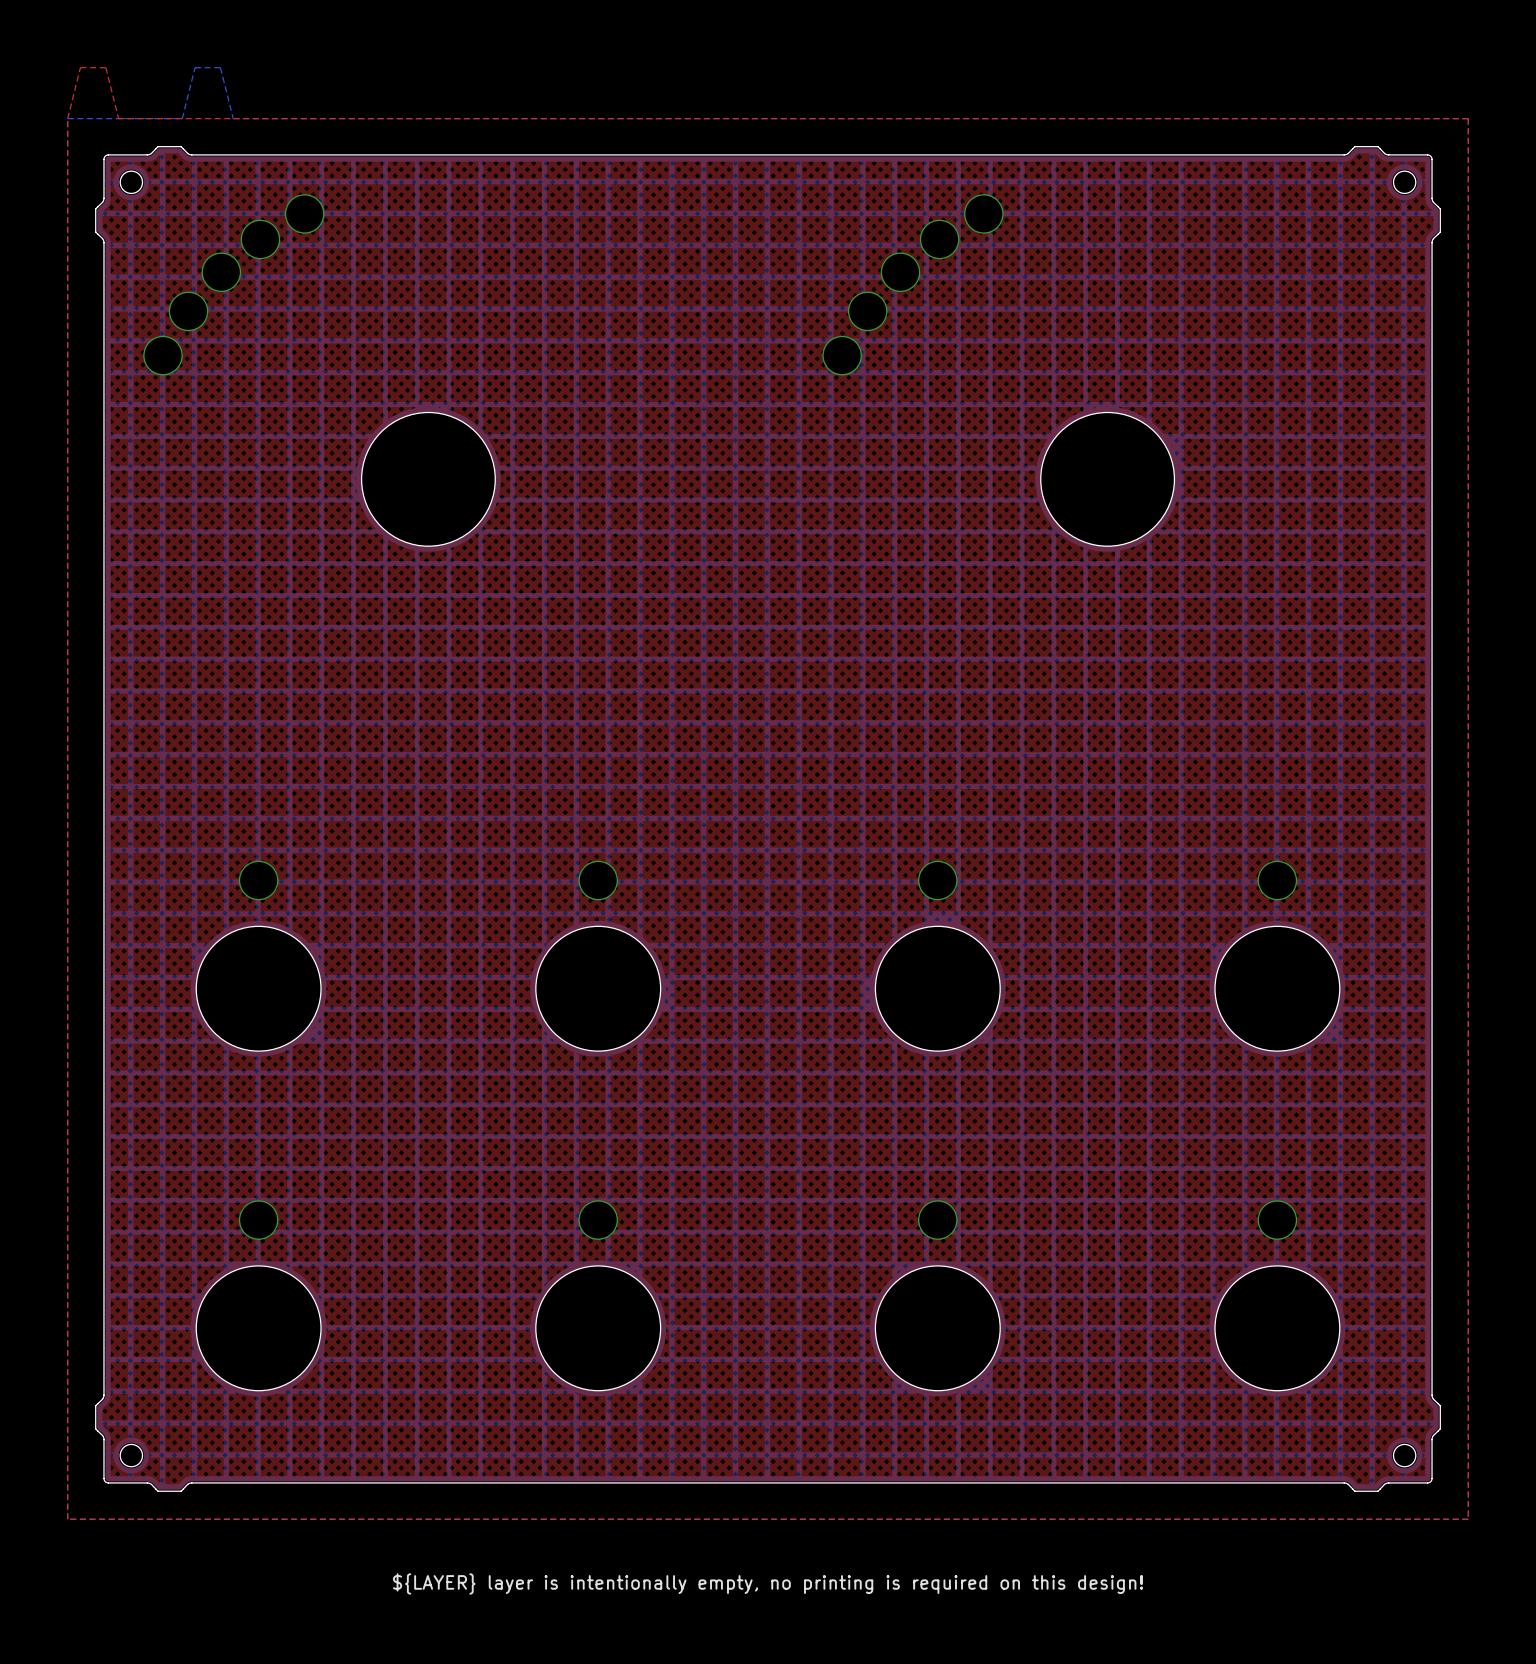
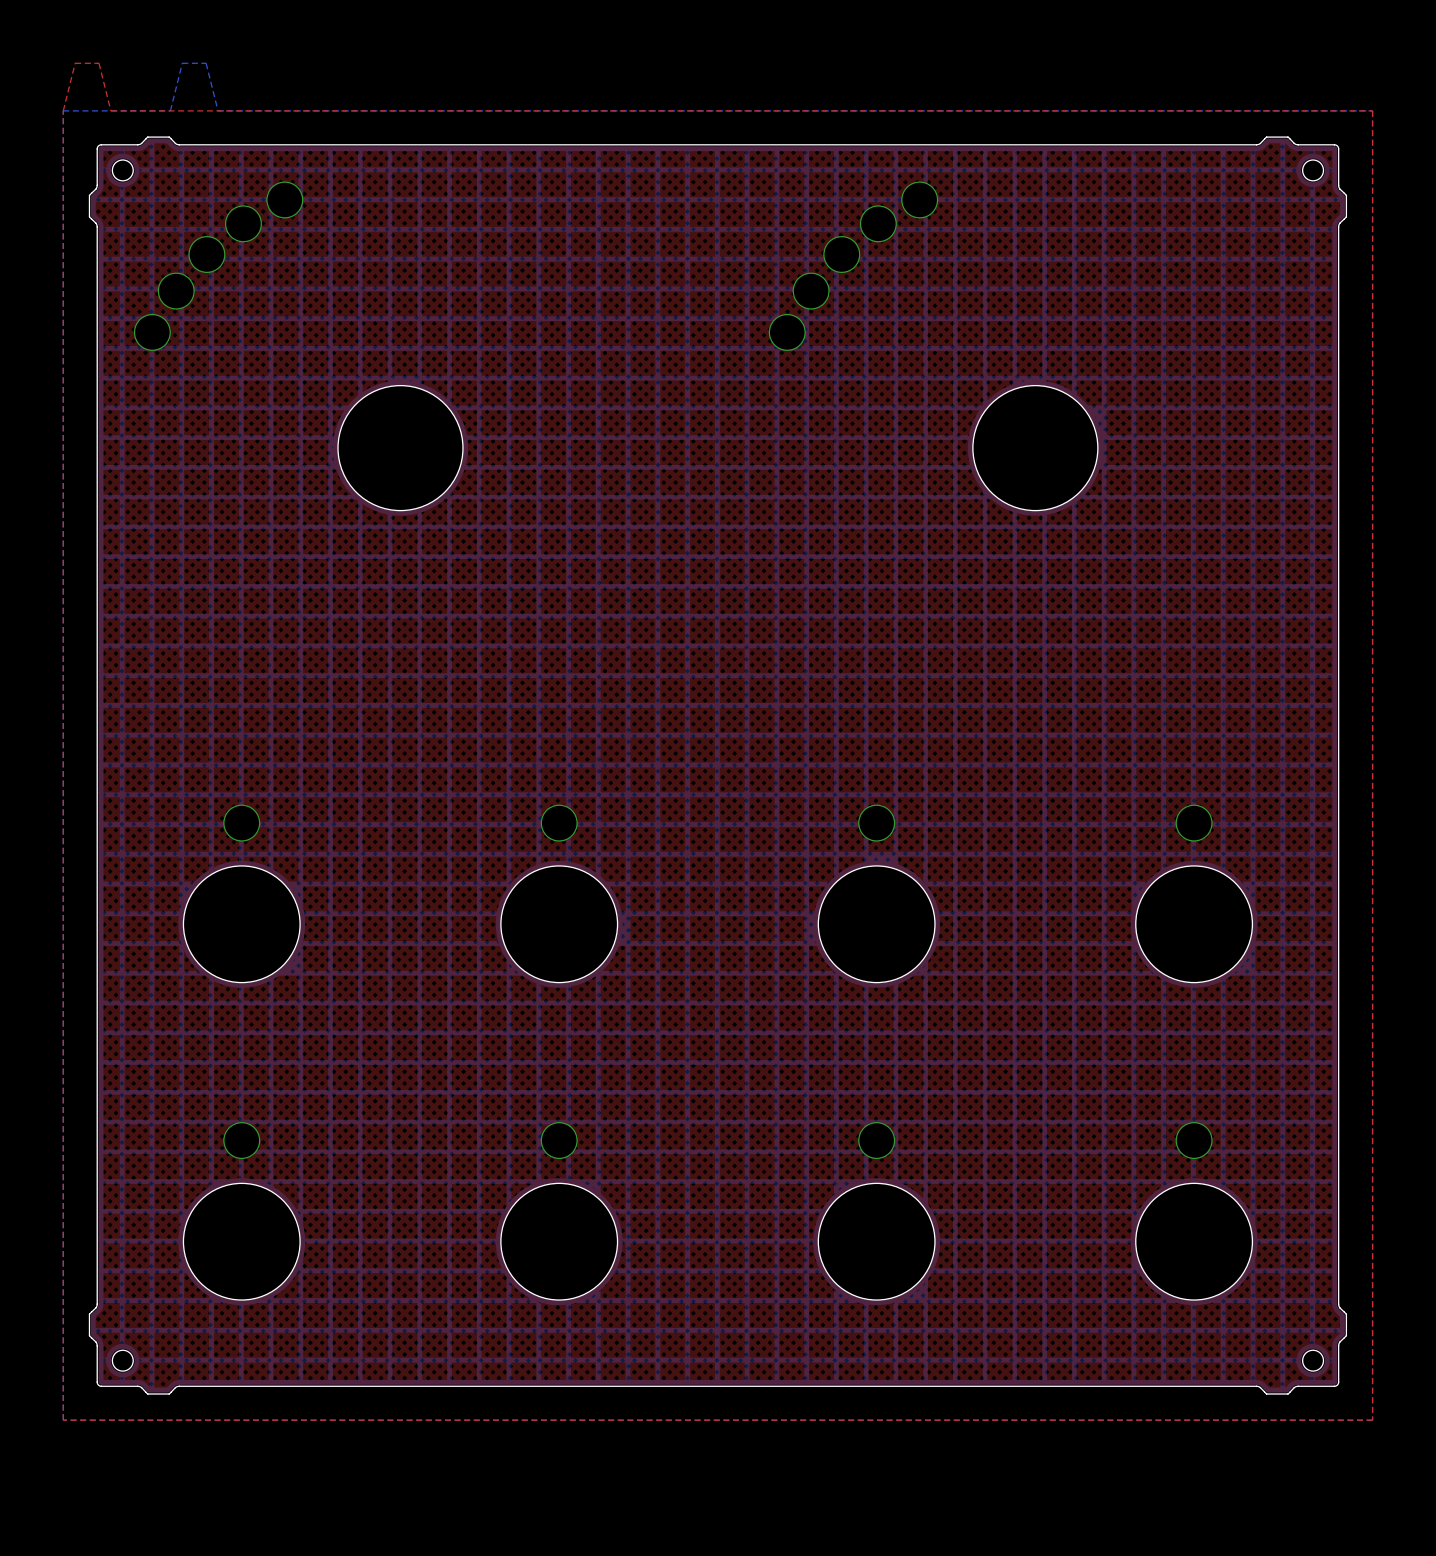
text: ${LAYER} layer is intentionally empty, no printing is required on this design! (768, 1583) -> none

